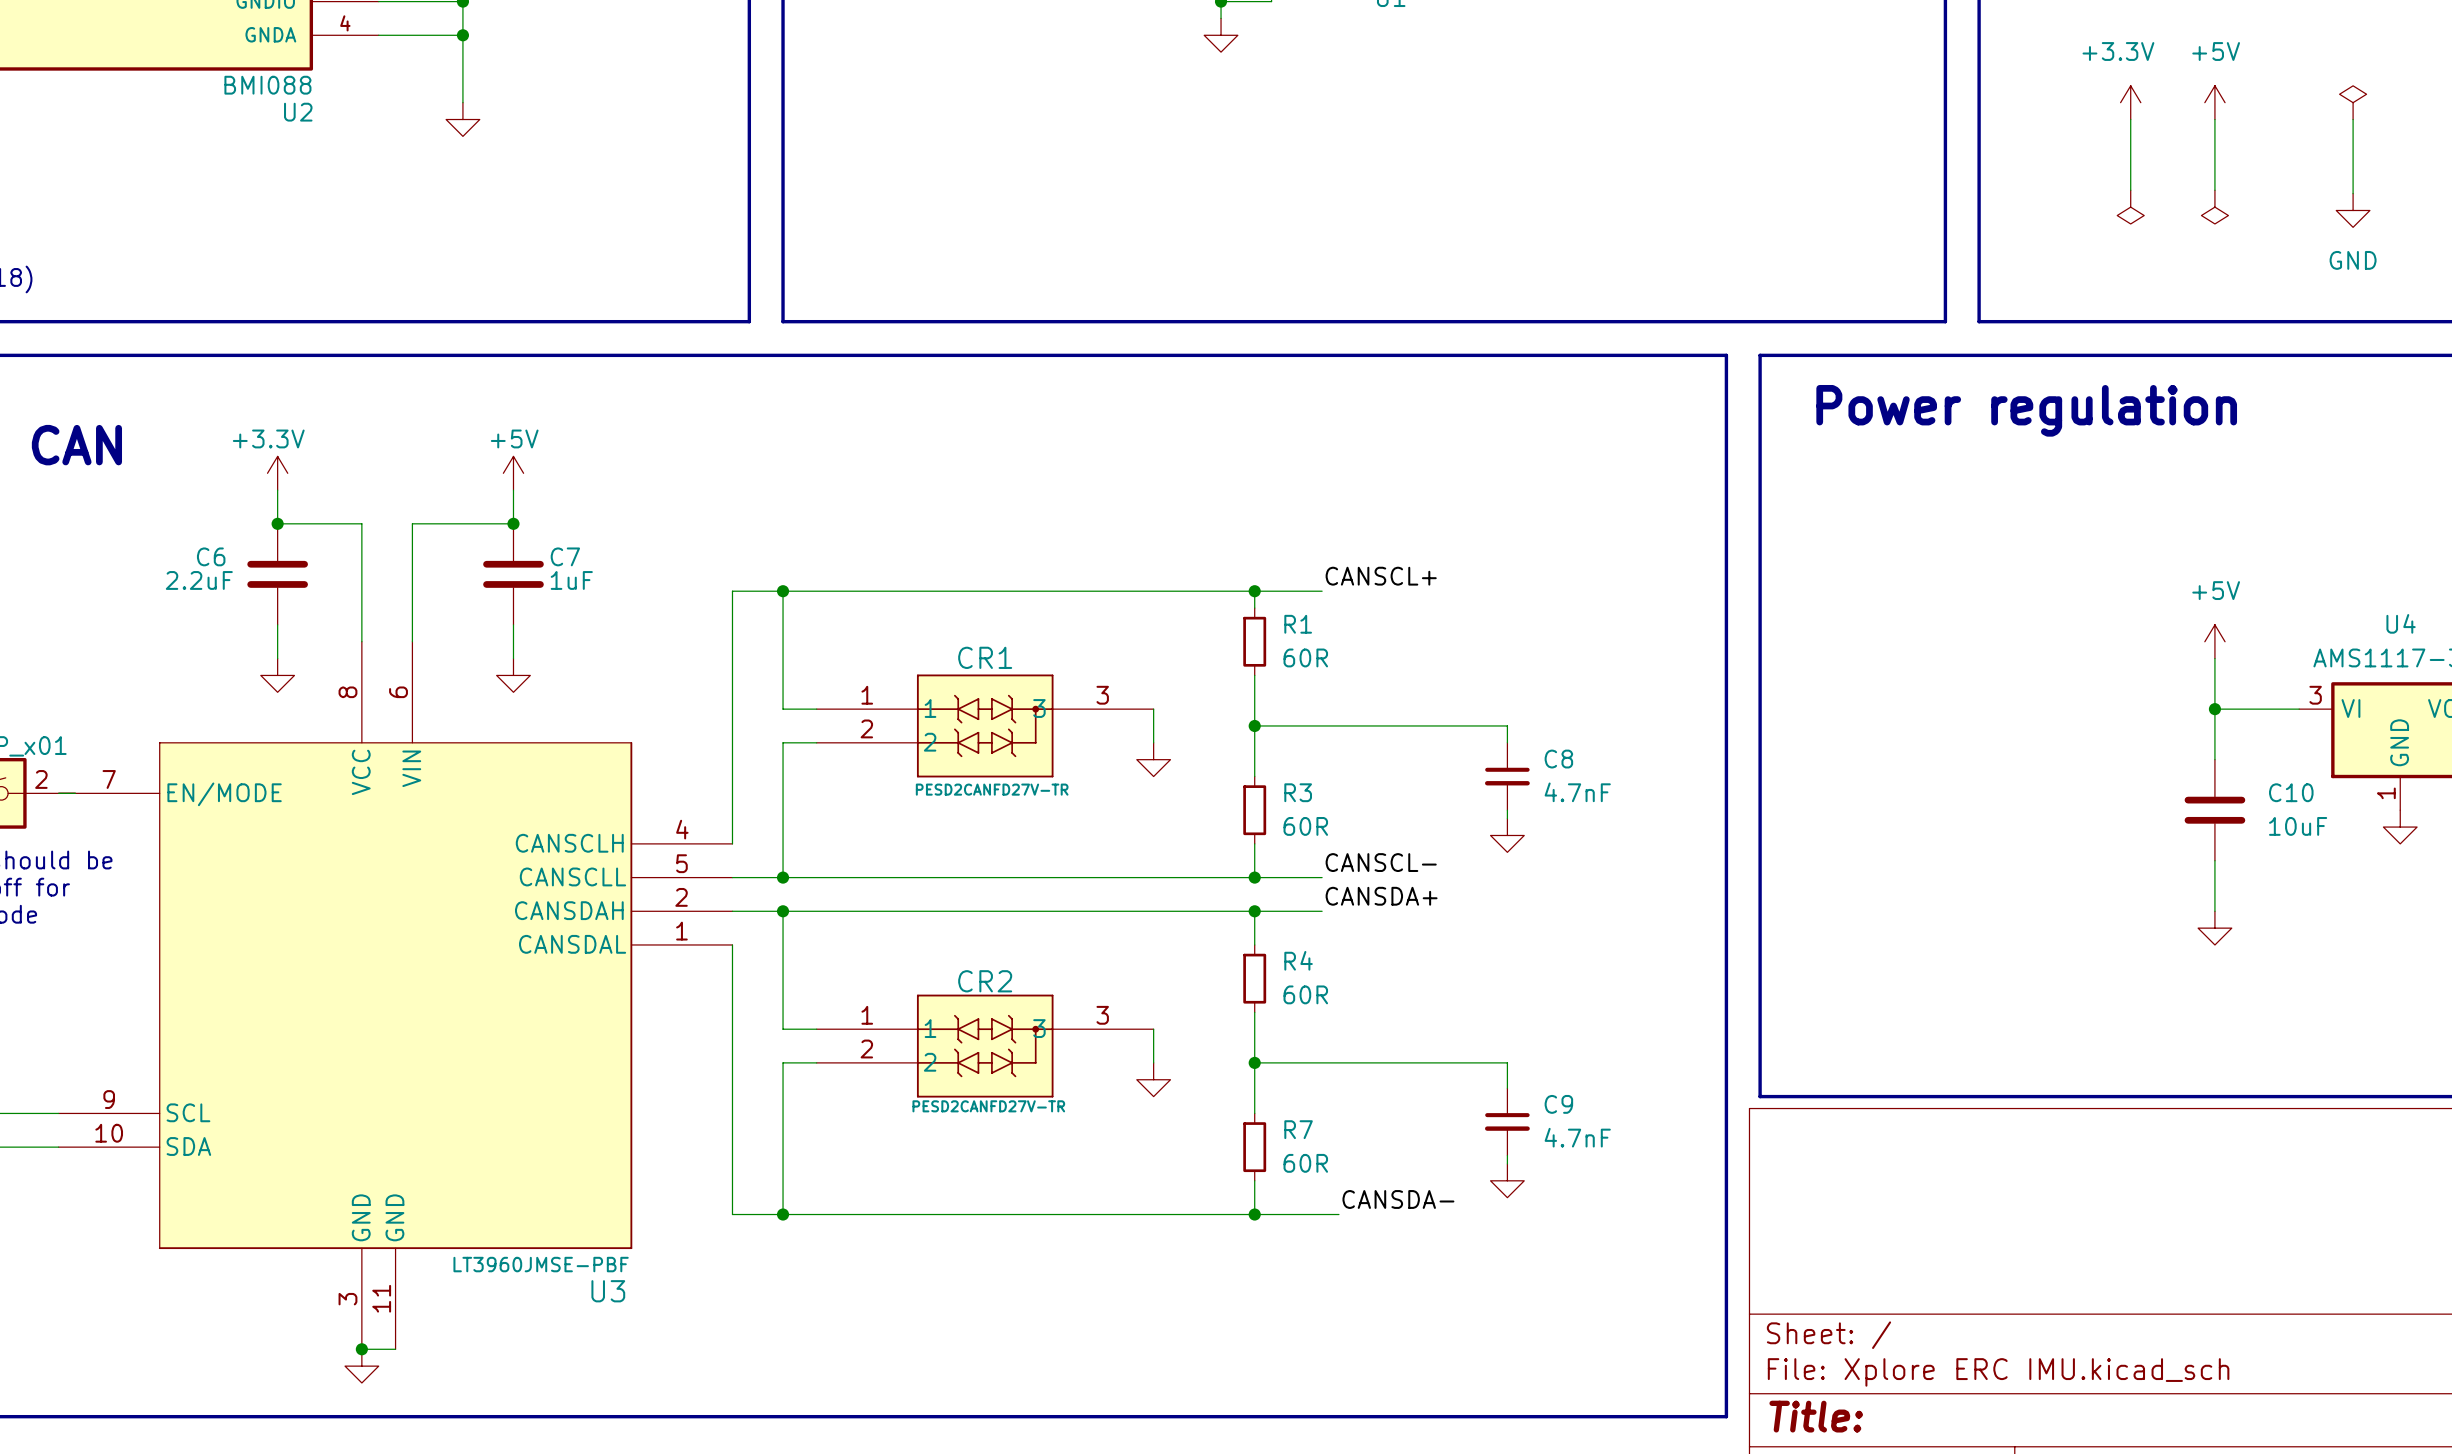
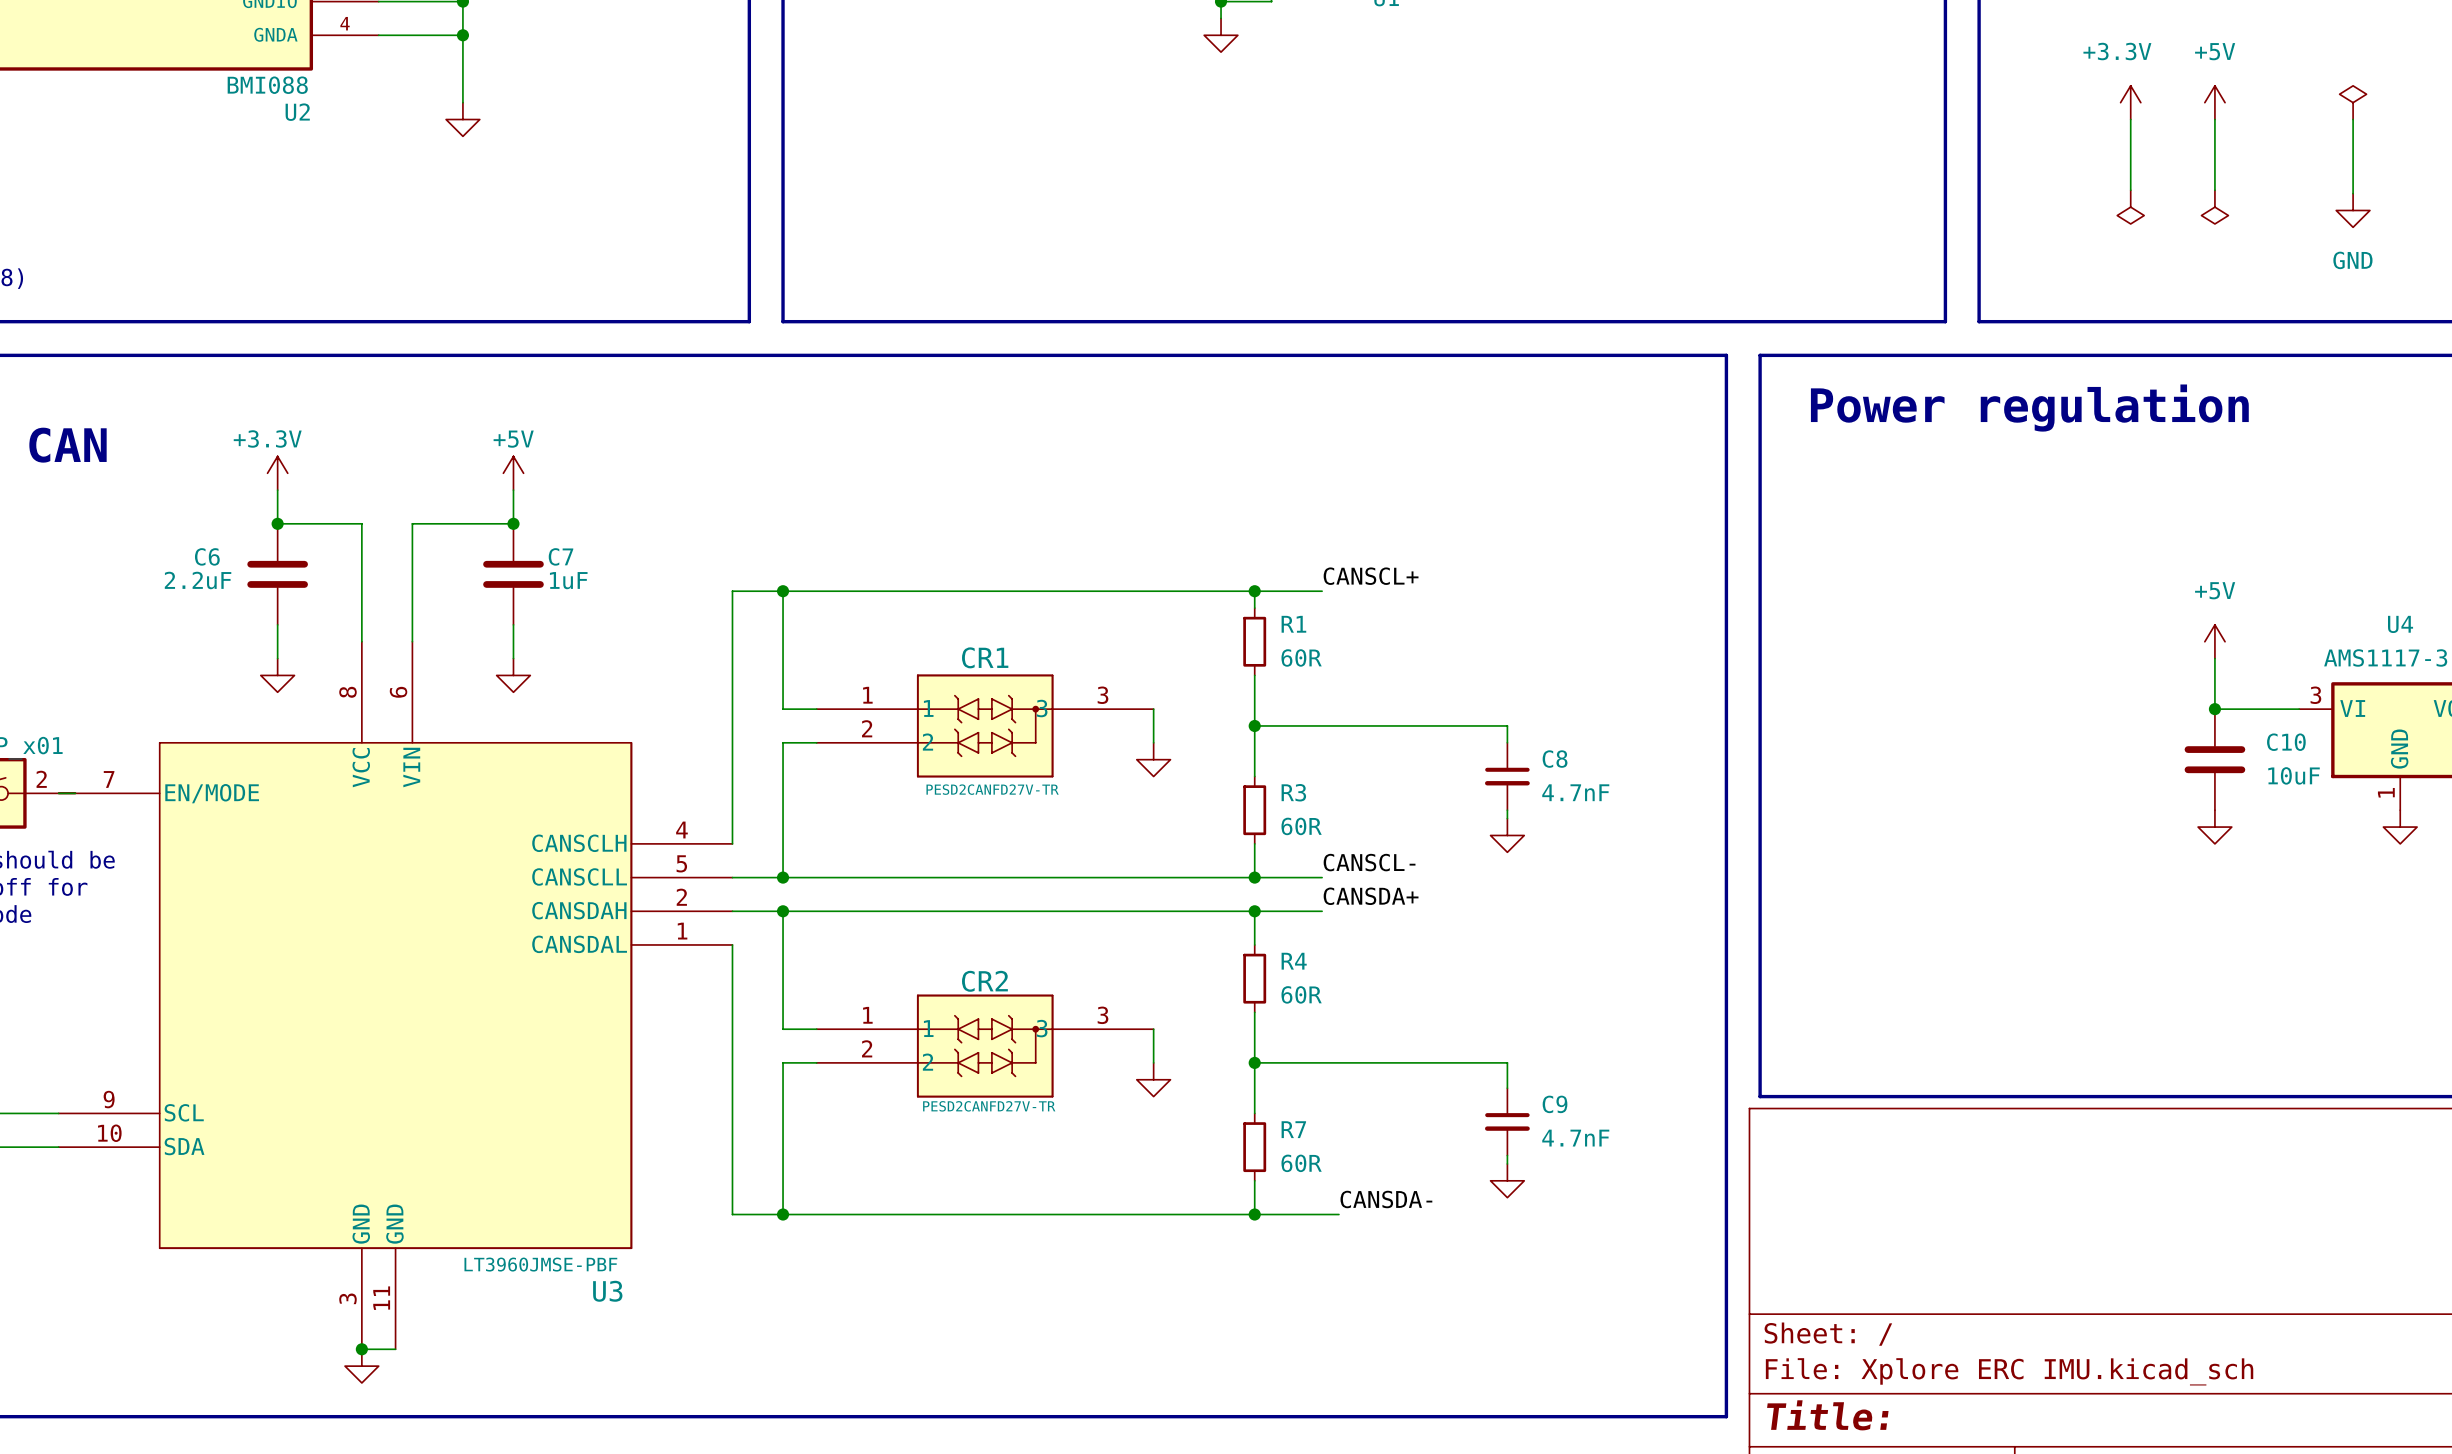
C10 position: (2214, 810) -> (2214, 759)
wire: (2214, 860) (2214, 911) -> none
power symbol position: (2214, 928) -> (2214, 827)

